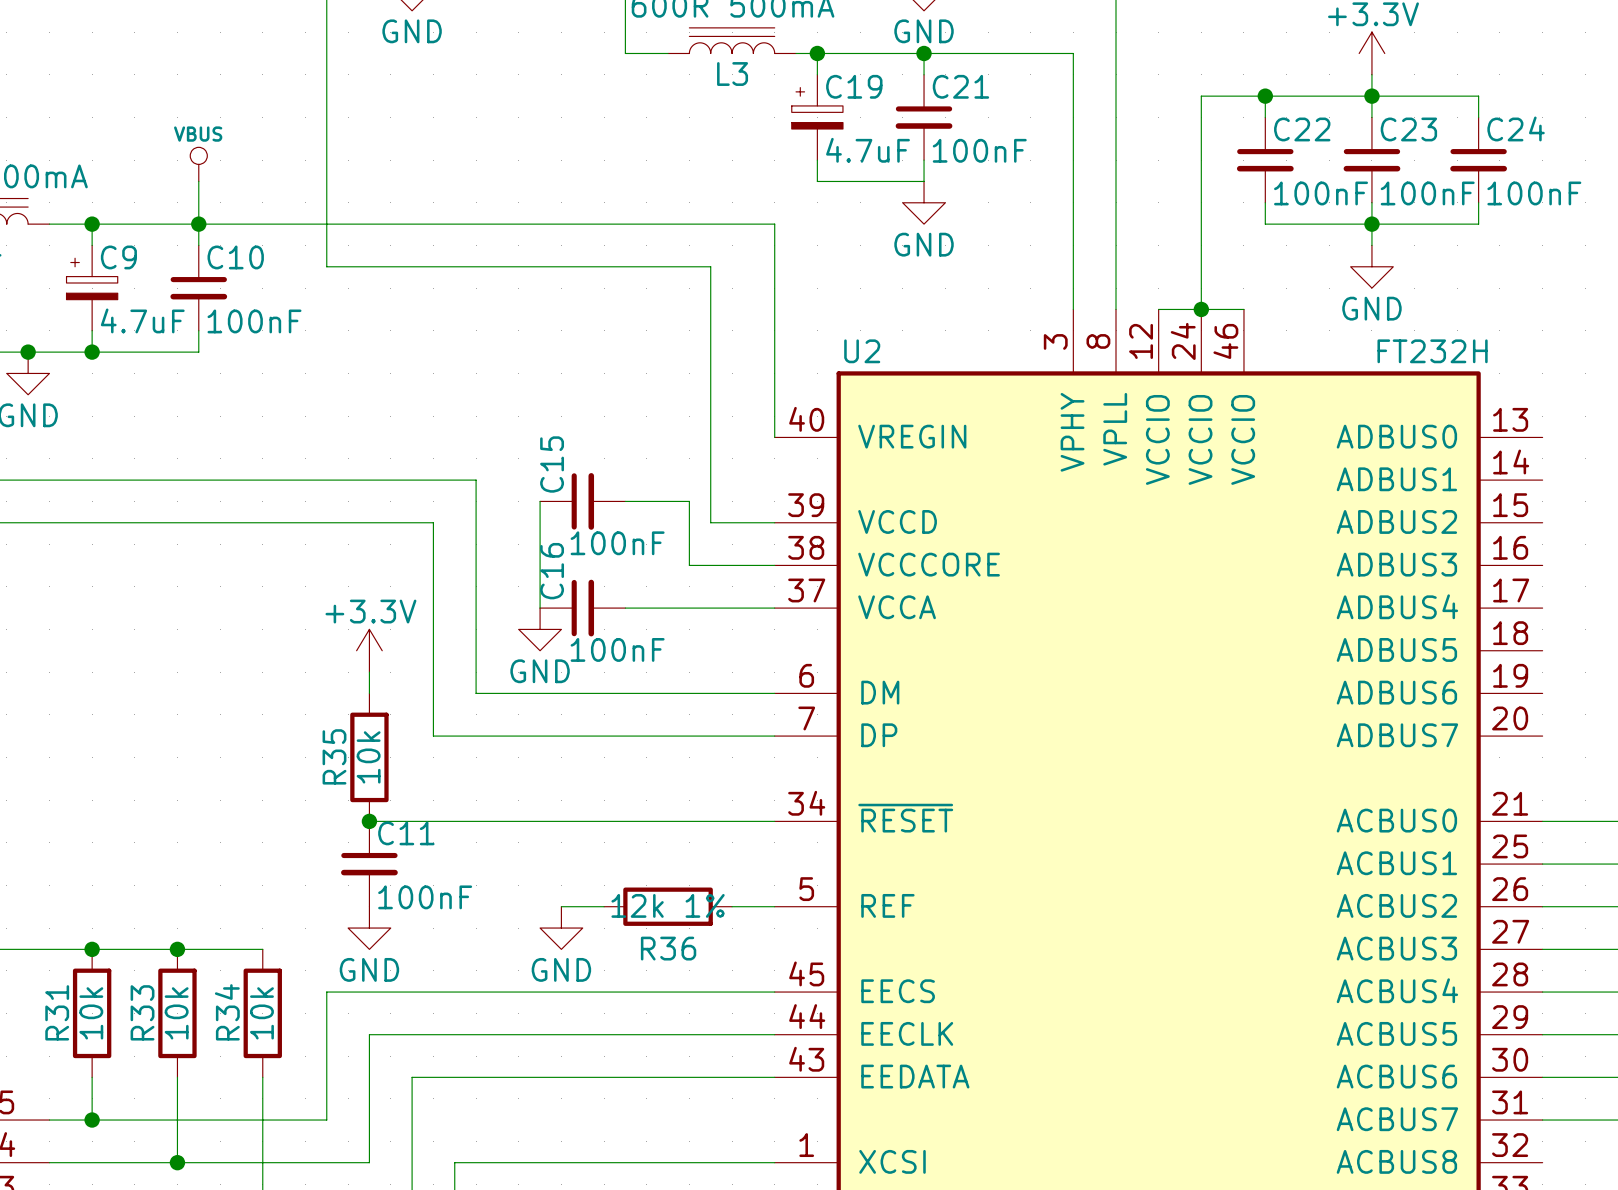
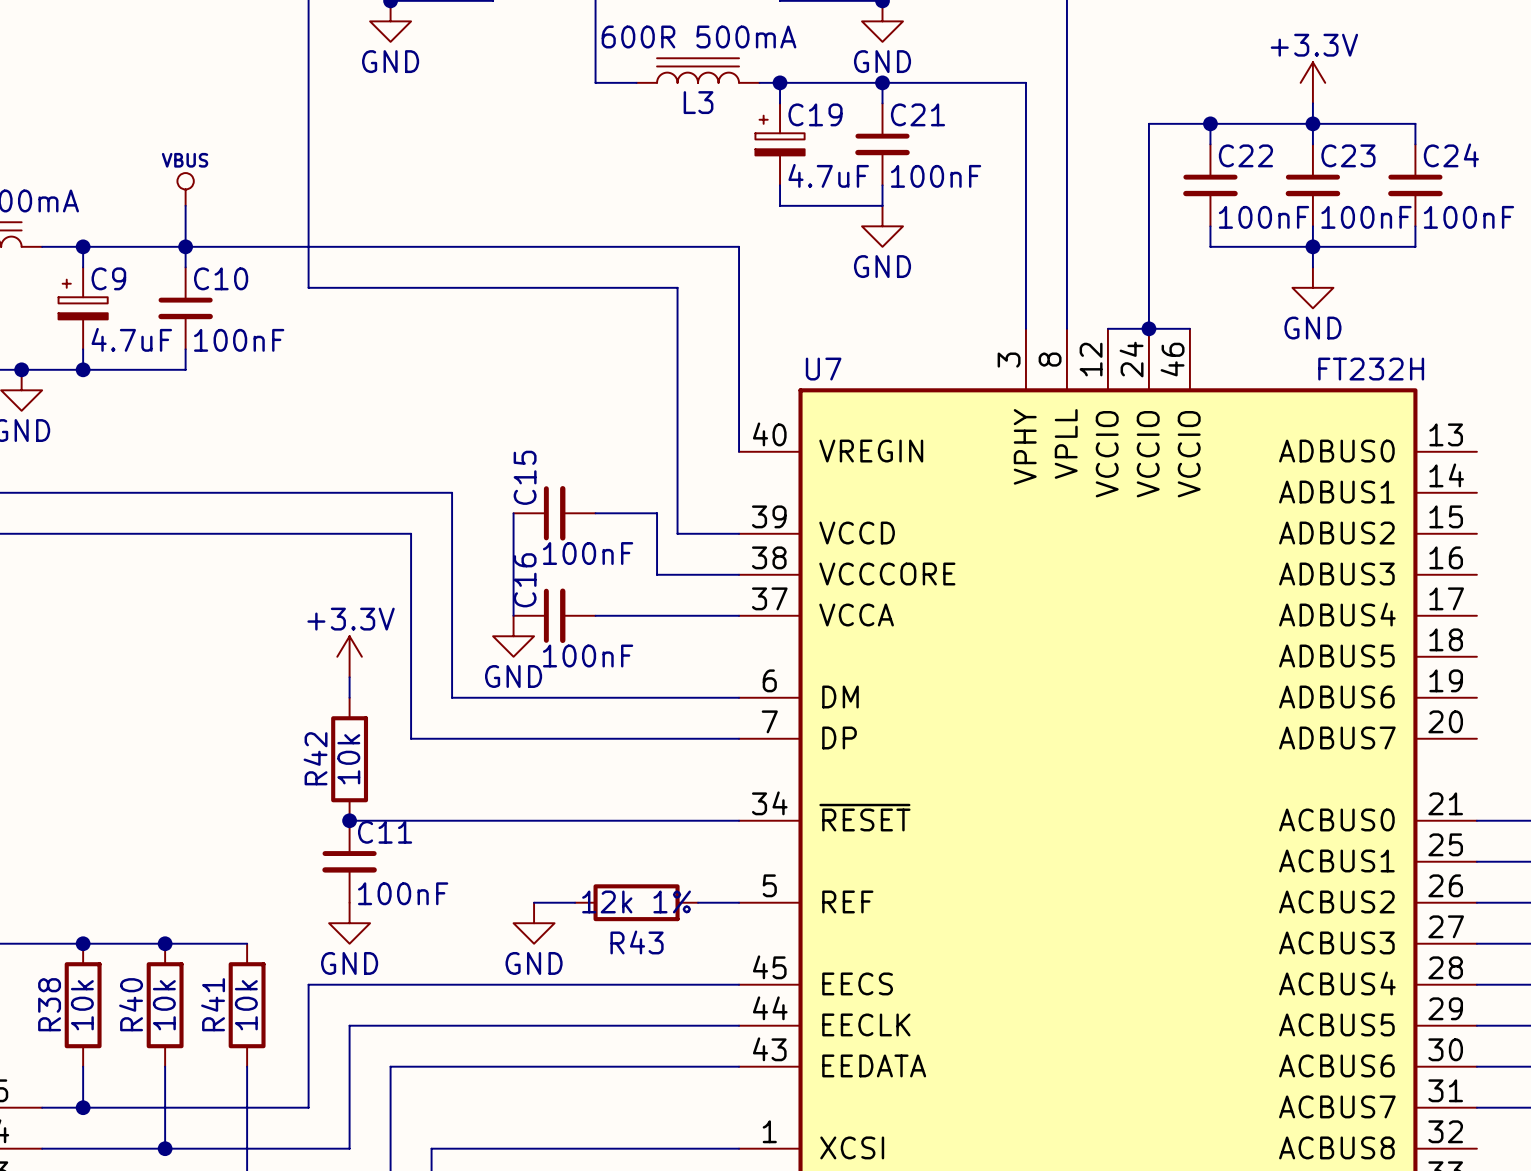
U2 name: U2 (862, 351) -> U7 (823, 369)
R35 name: R35 (334, 756) -> R42 (315, 758)
R36 name: R36 (668, 948) -> R43 (637, 942)
R31 name: R31 (57, 1012) -> R38 (49, 1004)
R33 name: R33 (142, 1012) -> R40 (131, 1004)
R34 name: R34 (227, 1012) -> R41 (213, 1004)

